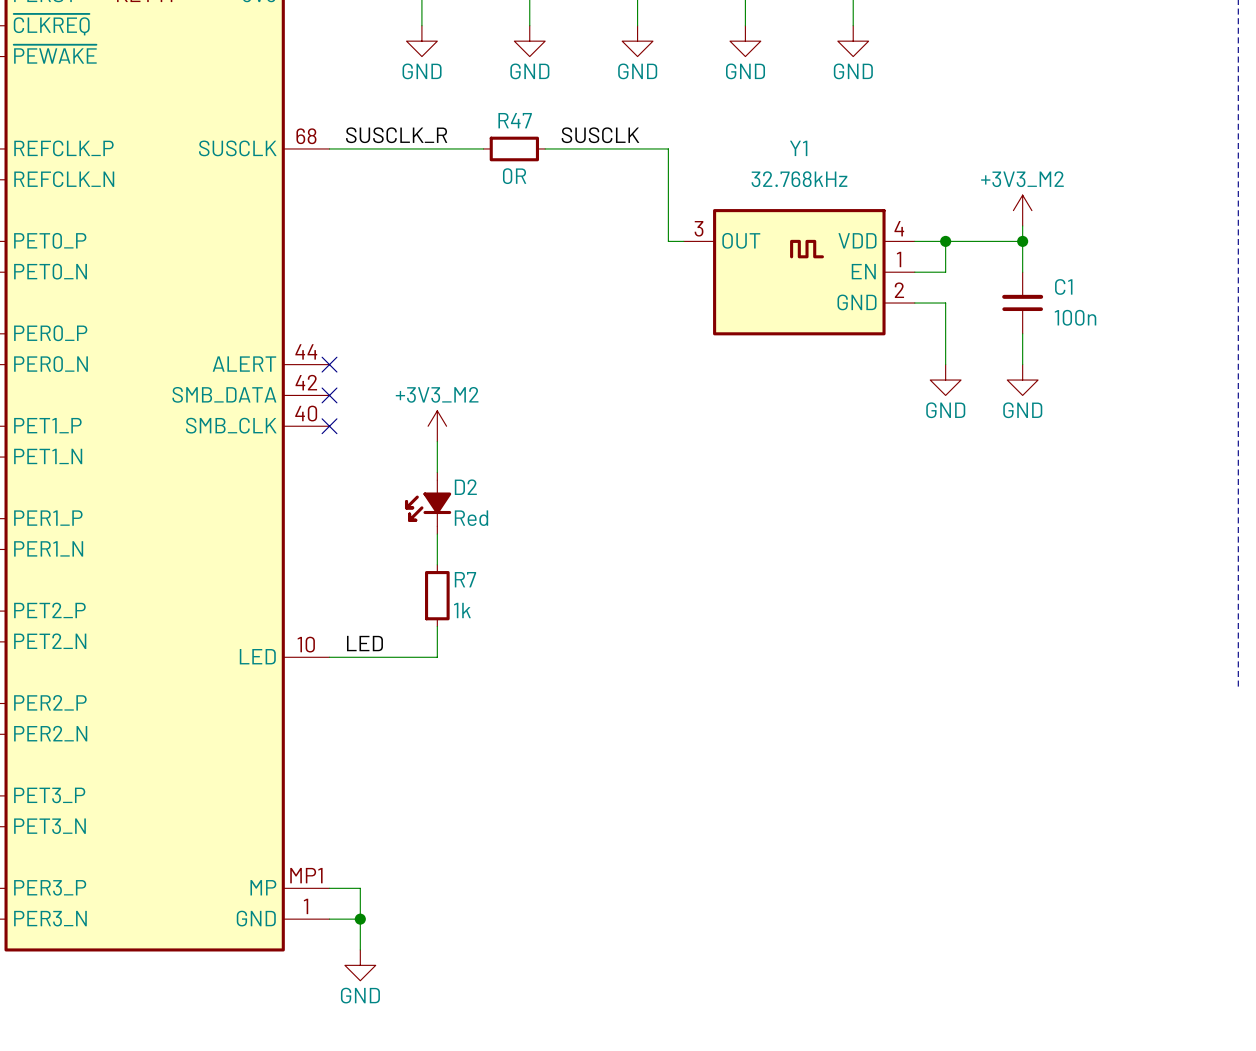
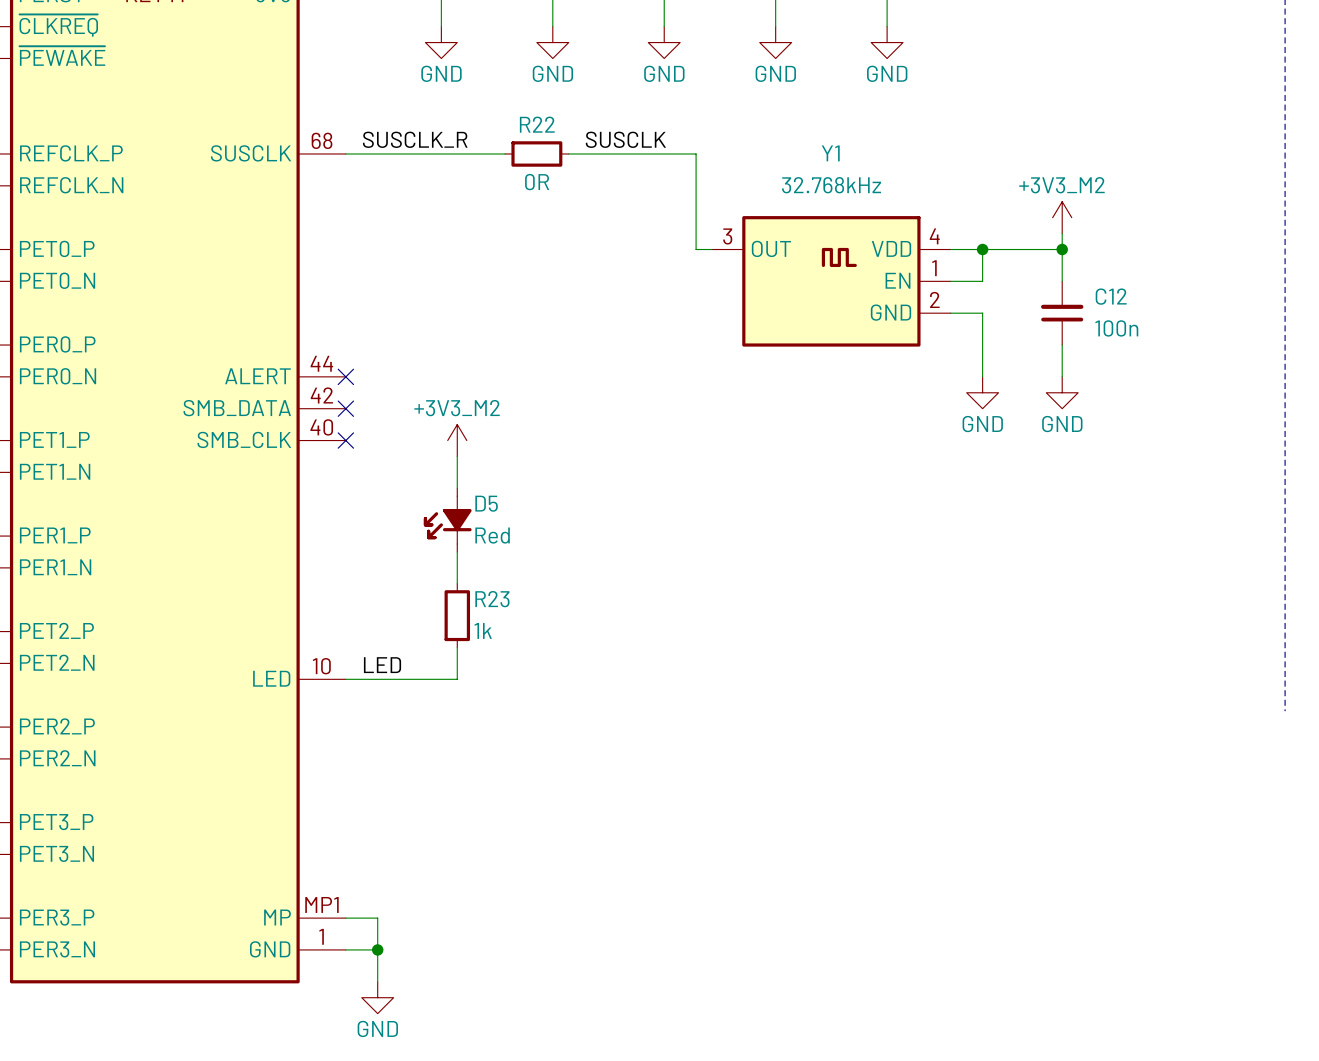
R47 name: R47 (515, 120) -> R22 (537, 124)
C1 name: C1 (1063, 286) -> C12 (1111, 296)
D2 name: D2 (465, 487) -> D5 (486, 503)
R7 name: R7 (465, 579) -> R23 (492, 599)

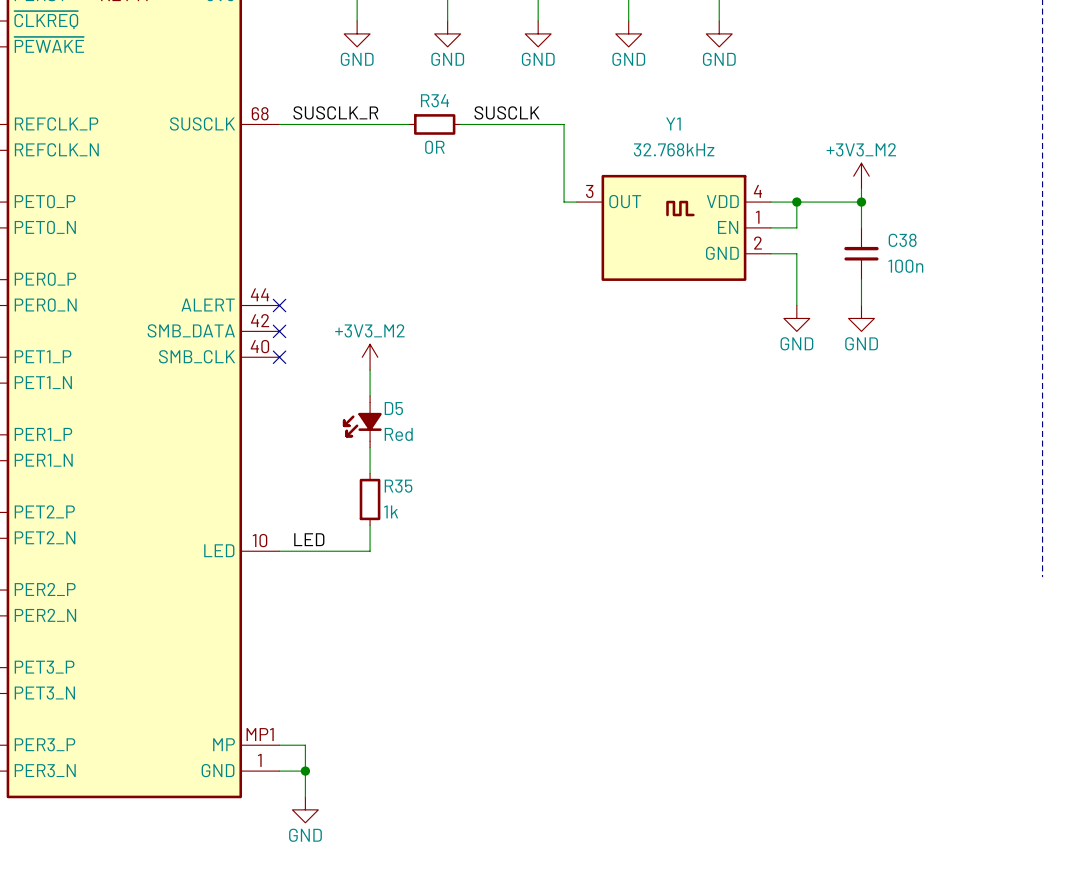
R22 name: R22 (537, 124) -> R34 (435, 100)
C12 name: C12 (1111, 296) -> C38 (902, 240)
R23 name: R23 (492, 599) -> R35 (398, 486)

